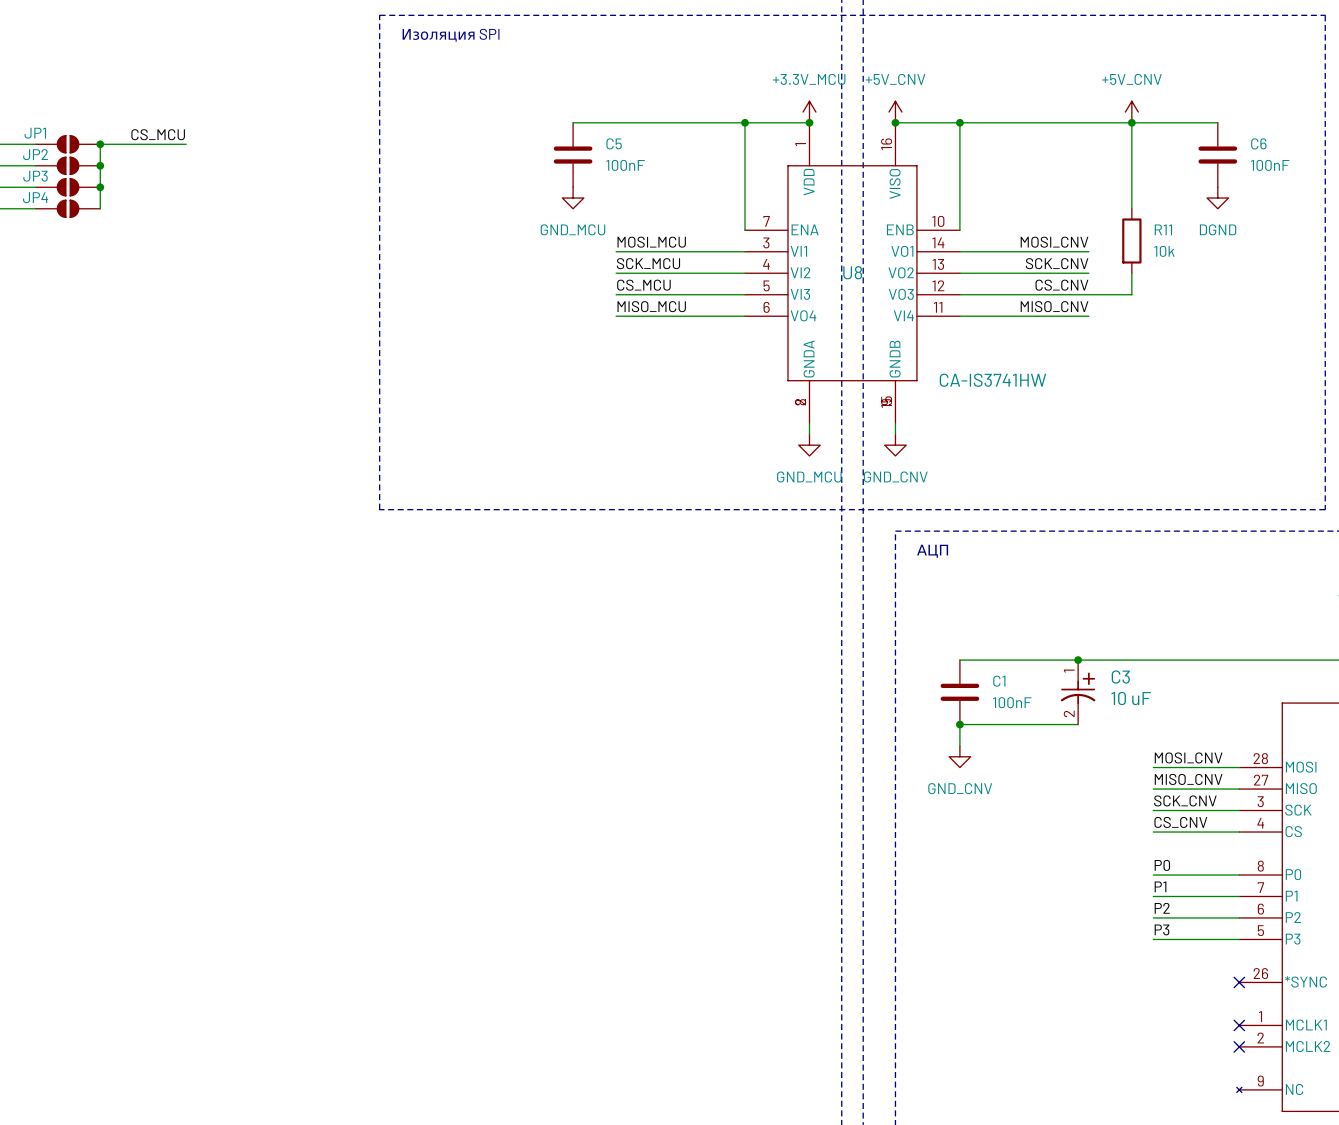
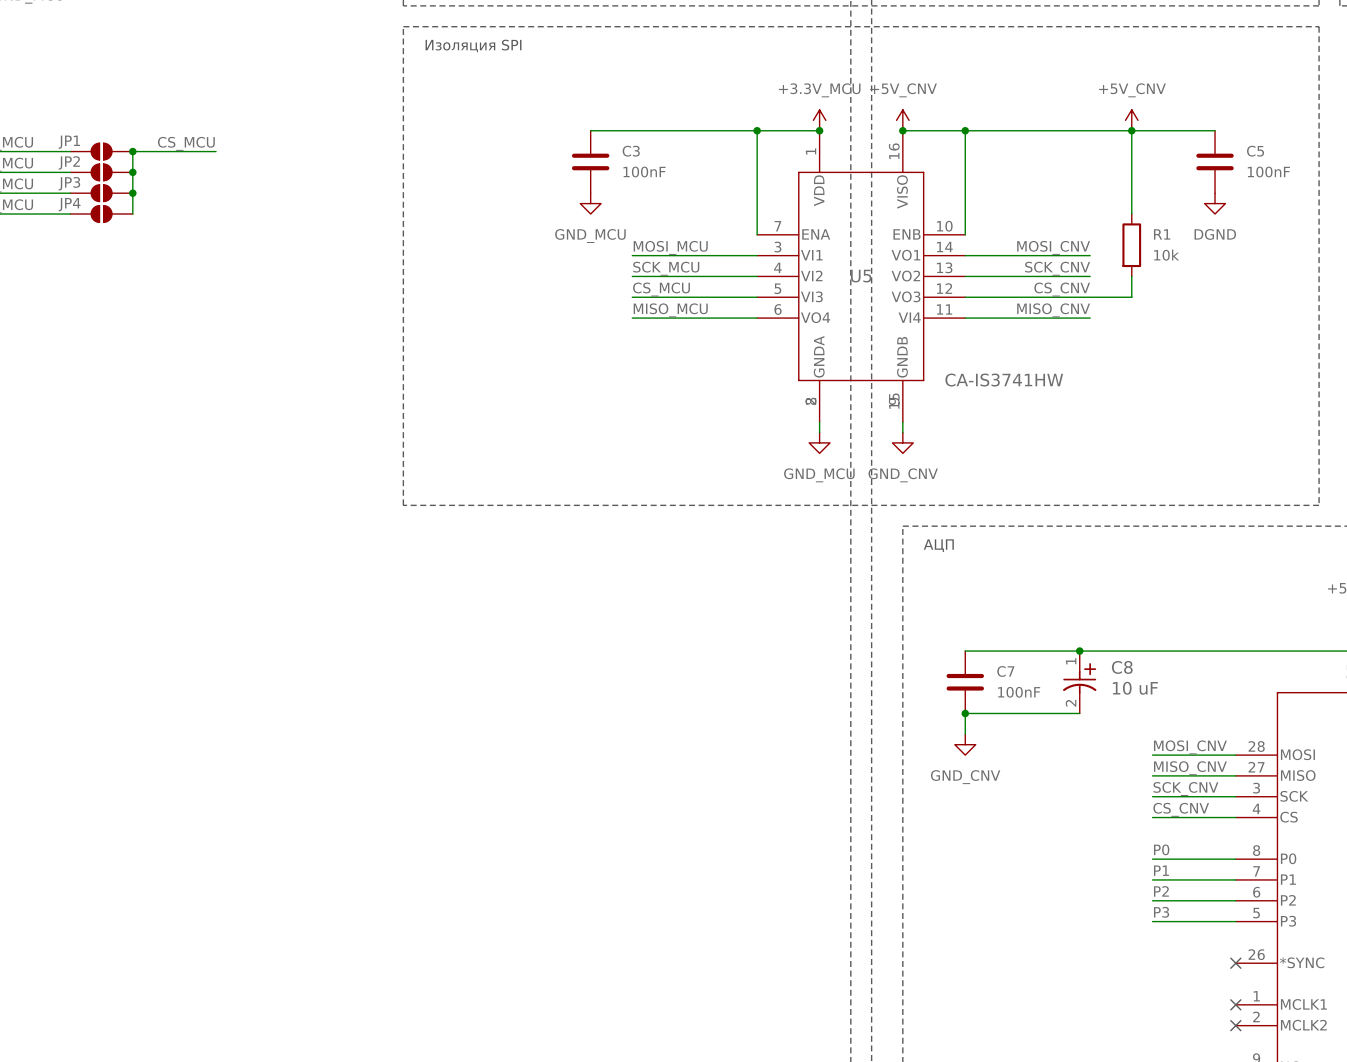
C5 name: C5 (614, 143) -> C3 (631, 151)
C6 name: C6 (1258, 143) -> C5 (1255, 151)
R11 name: R11 (1163, 229) -> R1 (1162, 234)
U8 name: U8 (852, 272) -> U5 (861, 276)
C3 name: C3 (1120, 677) -> C8 (1122, 667)
C1 name: C1 (999, 681) -> C7 (1005, 671)

